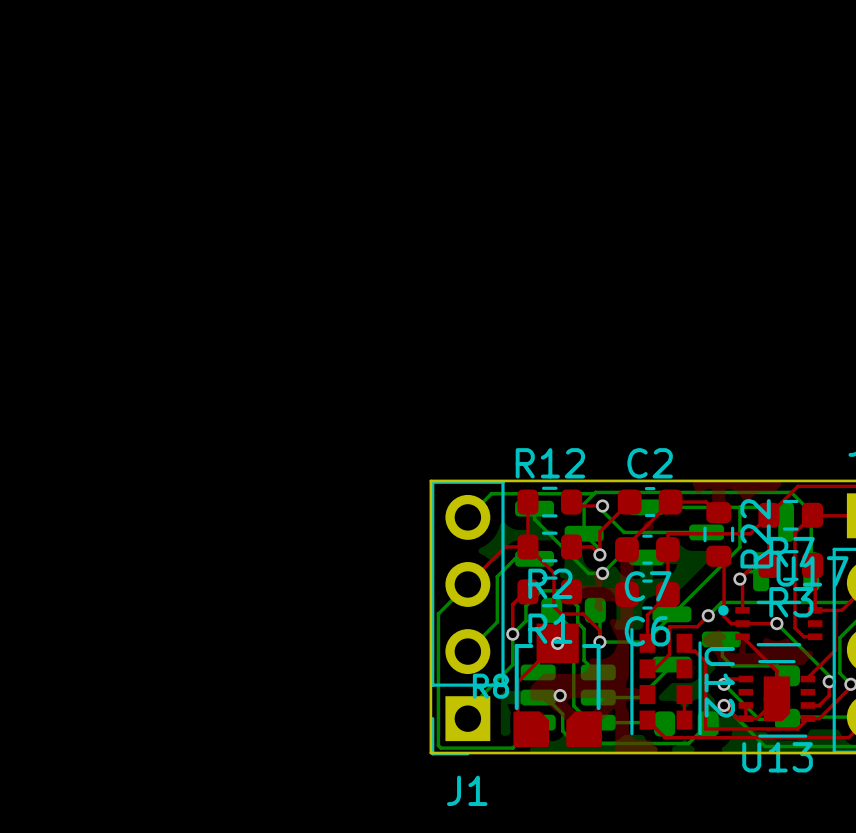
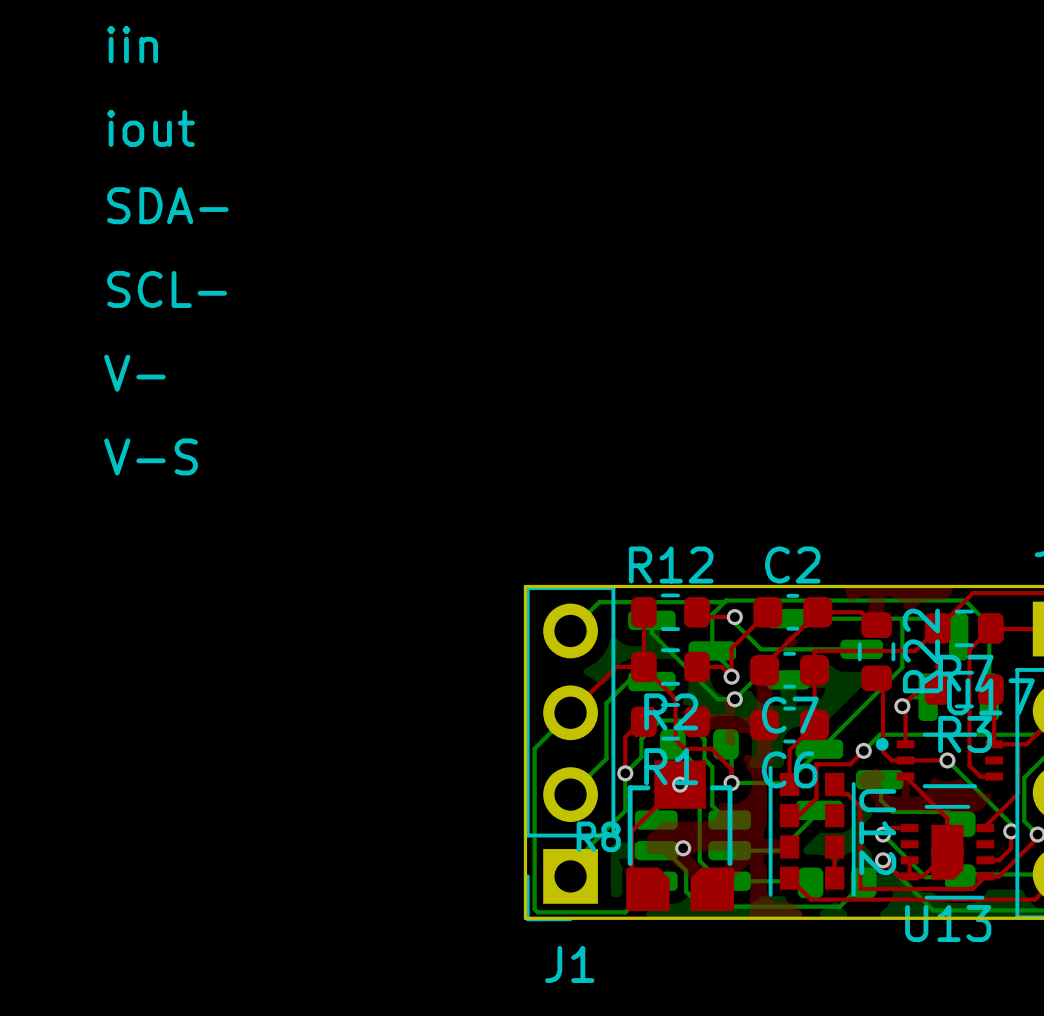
text: none -> iin (132, 44)
text: none -> iout (151, 128)
text: none -> SDA- (167, 205)
text: none -> SCL- (167, 289)
text: none -> V- (134, 373)
text: none -> V-S (151, 456)

